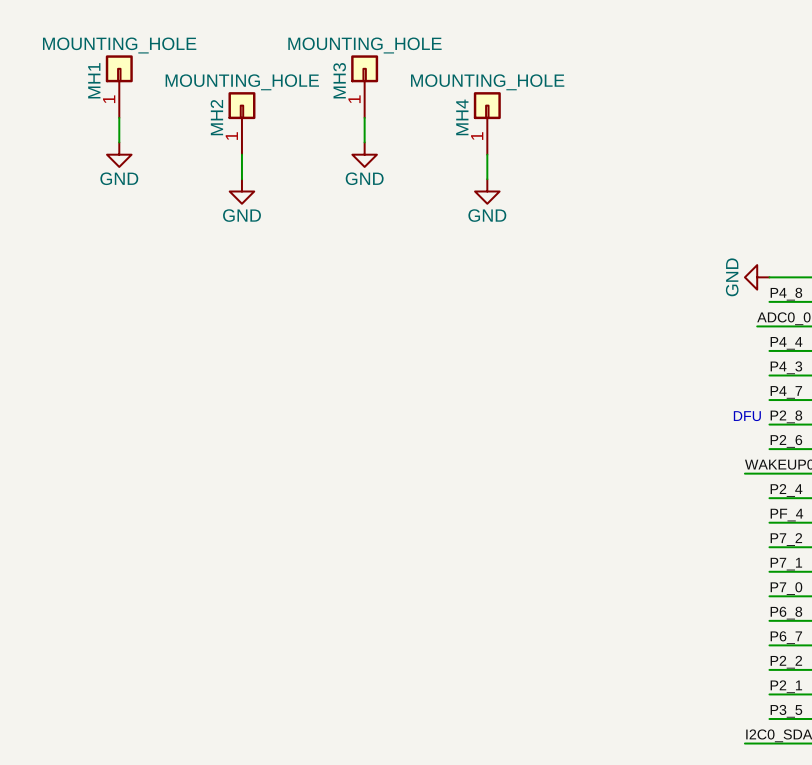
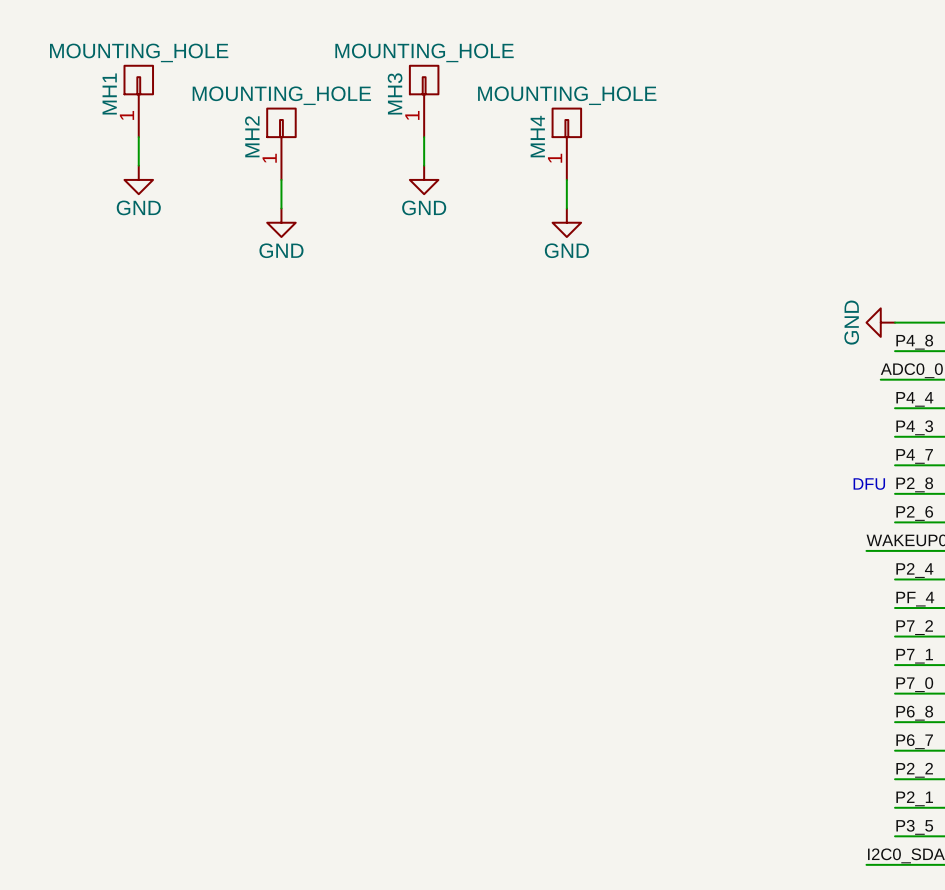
MH1 symbol: [105, 55, 133, 118] -> [124, 65, 154, 138]
MH3 symbol: [351, 55, 379, 118] -> [409, 65, 439, 138]
MH2 symbol: [228, 92, 256, 155] -> [267, 108, 296, 180]
MH4 symbol: [473, 92, 501, 155] -> [552, 108, 582, 180]

